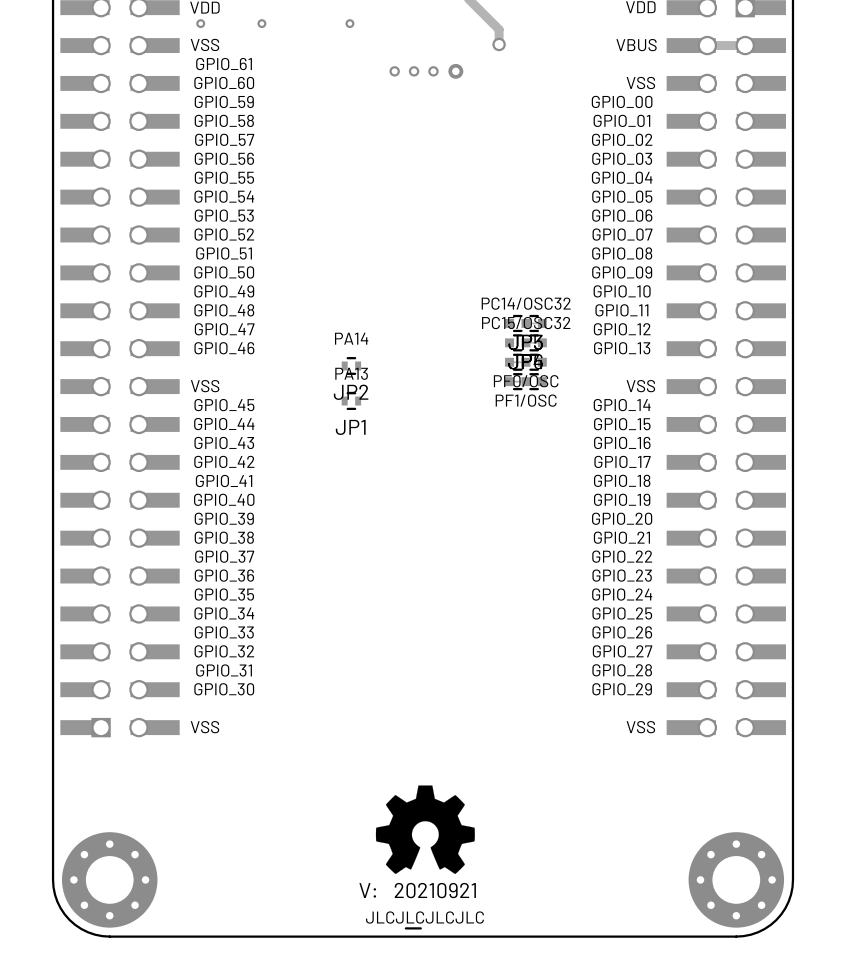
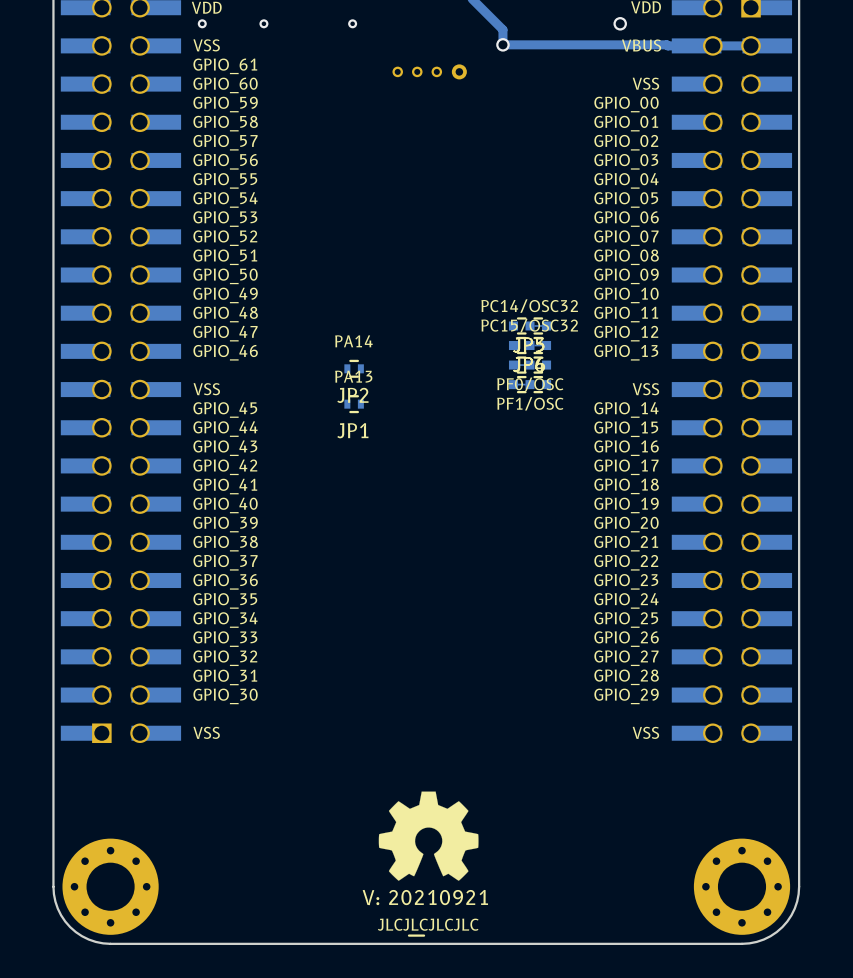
via: none -> (620, 23)
track: none -> (502, 44) (696, 45)

